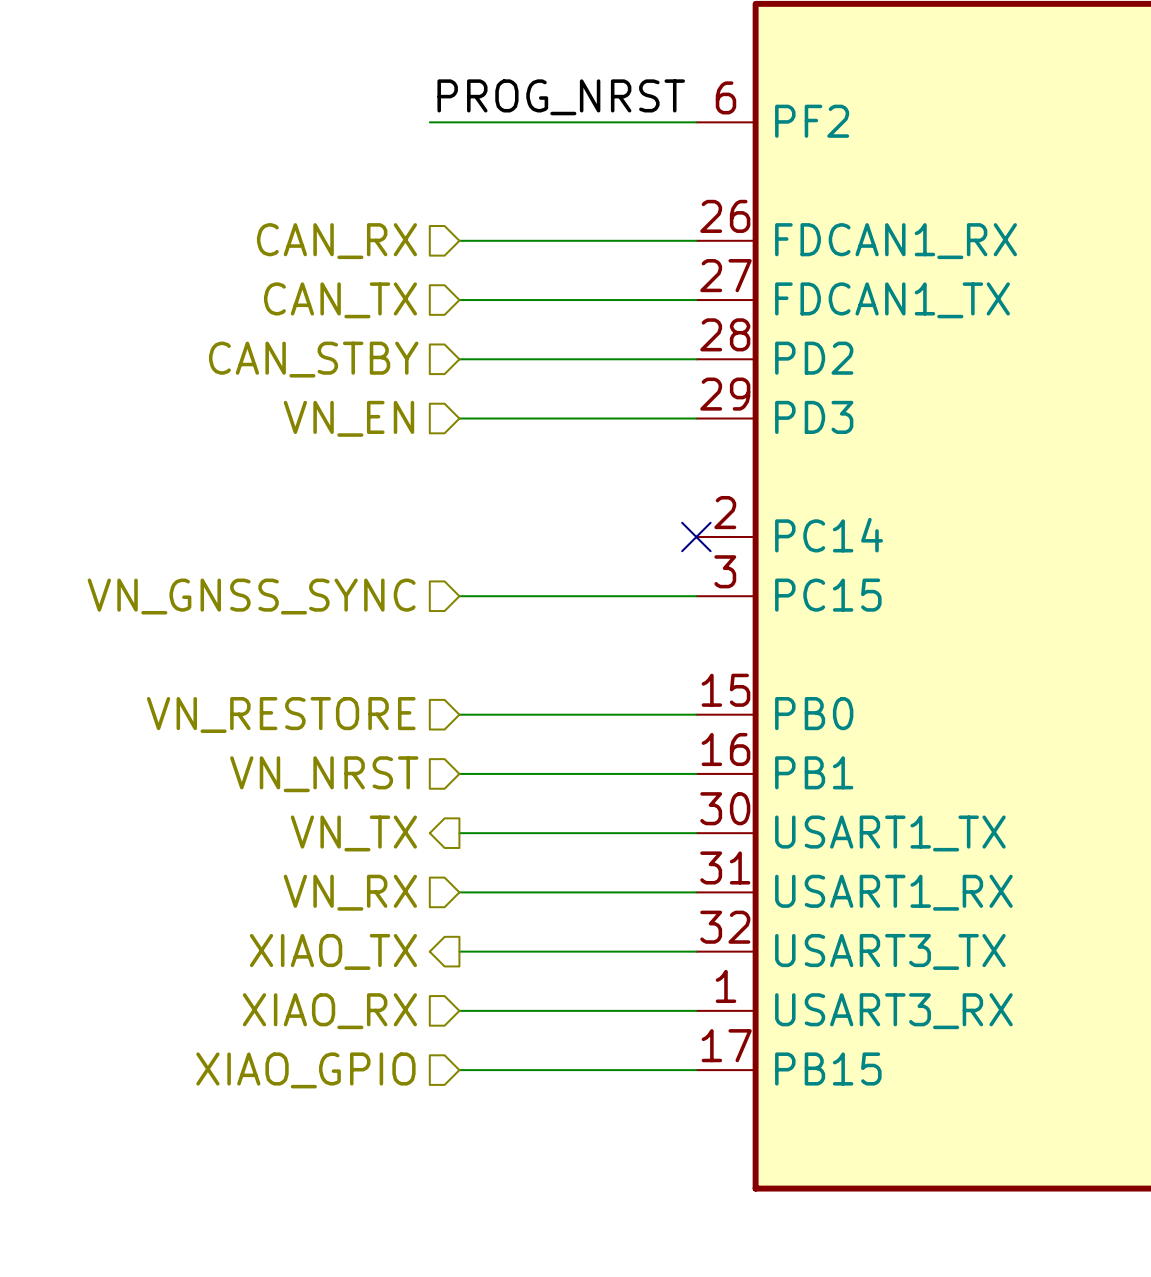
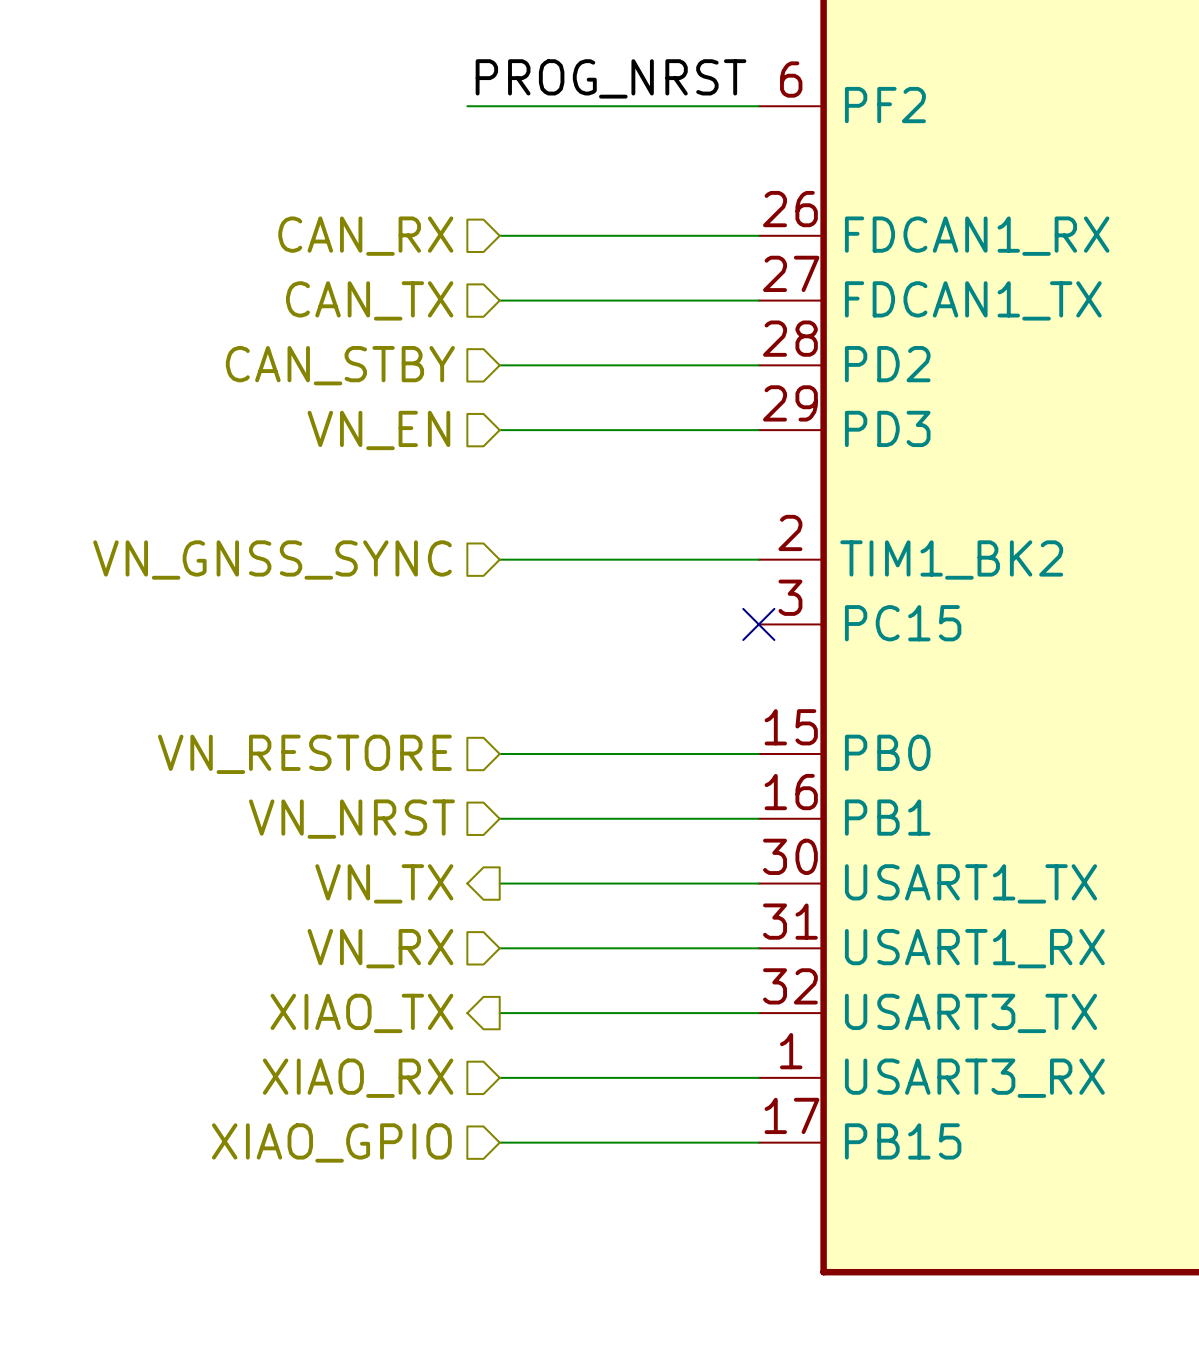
part pin name: PC14 (829, 535) -> TIM1_BK2 (951, 560)
no-connect mark position: (696, 536) -> (758, 624)
hierarchical label position: VN_GNSS_SYNC (251, 596) -> VN_GNSS_SYNC (272, 560)
wire: (459, 596) (696, 596) -> (499, 559) (758, 559)

